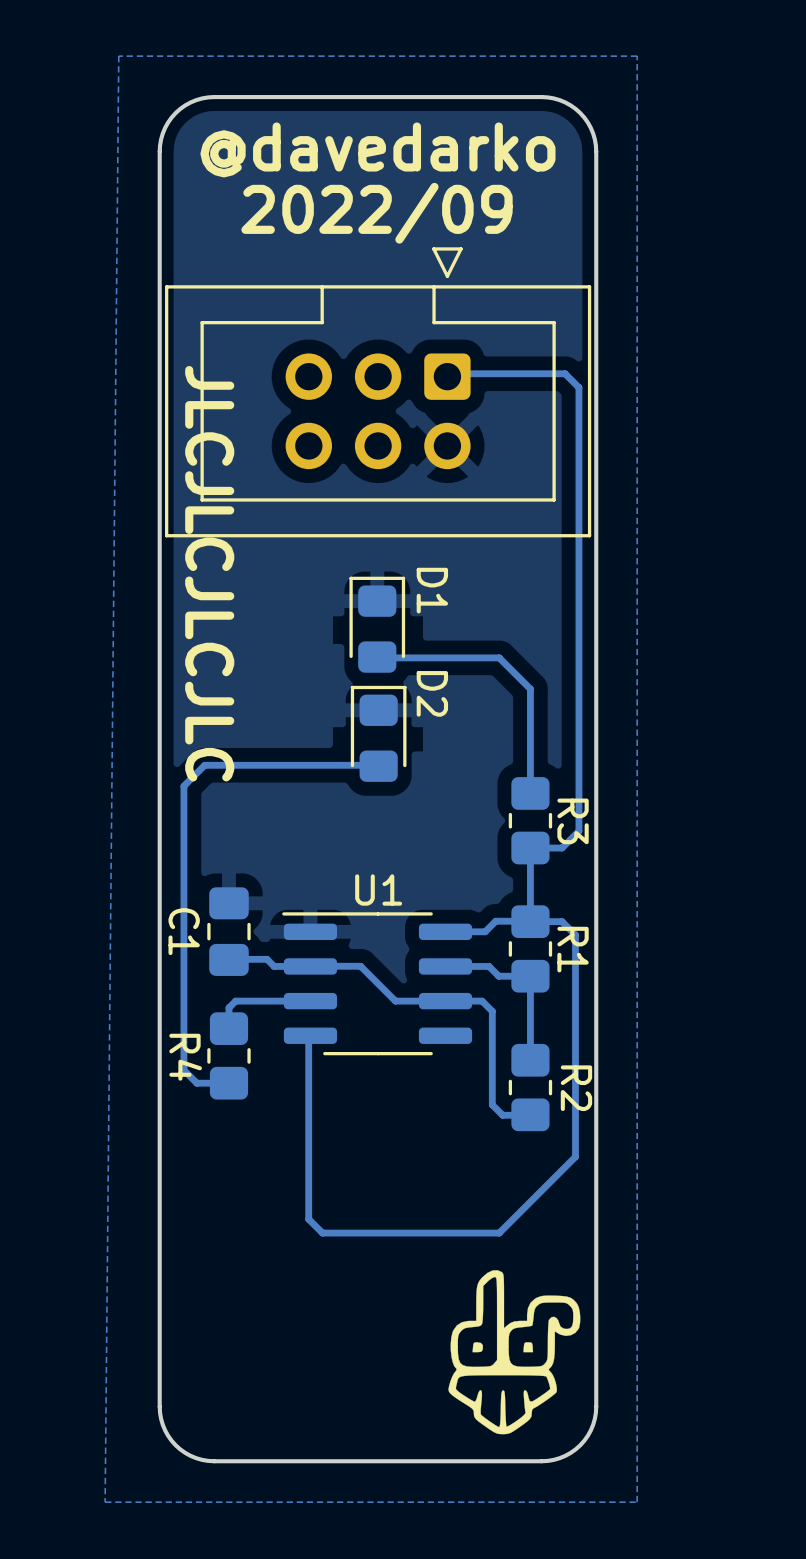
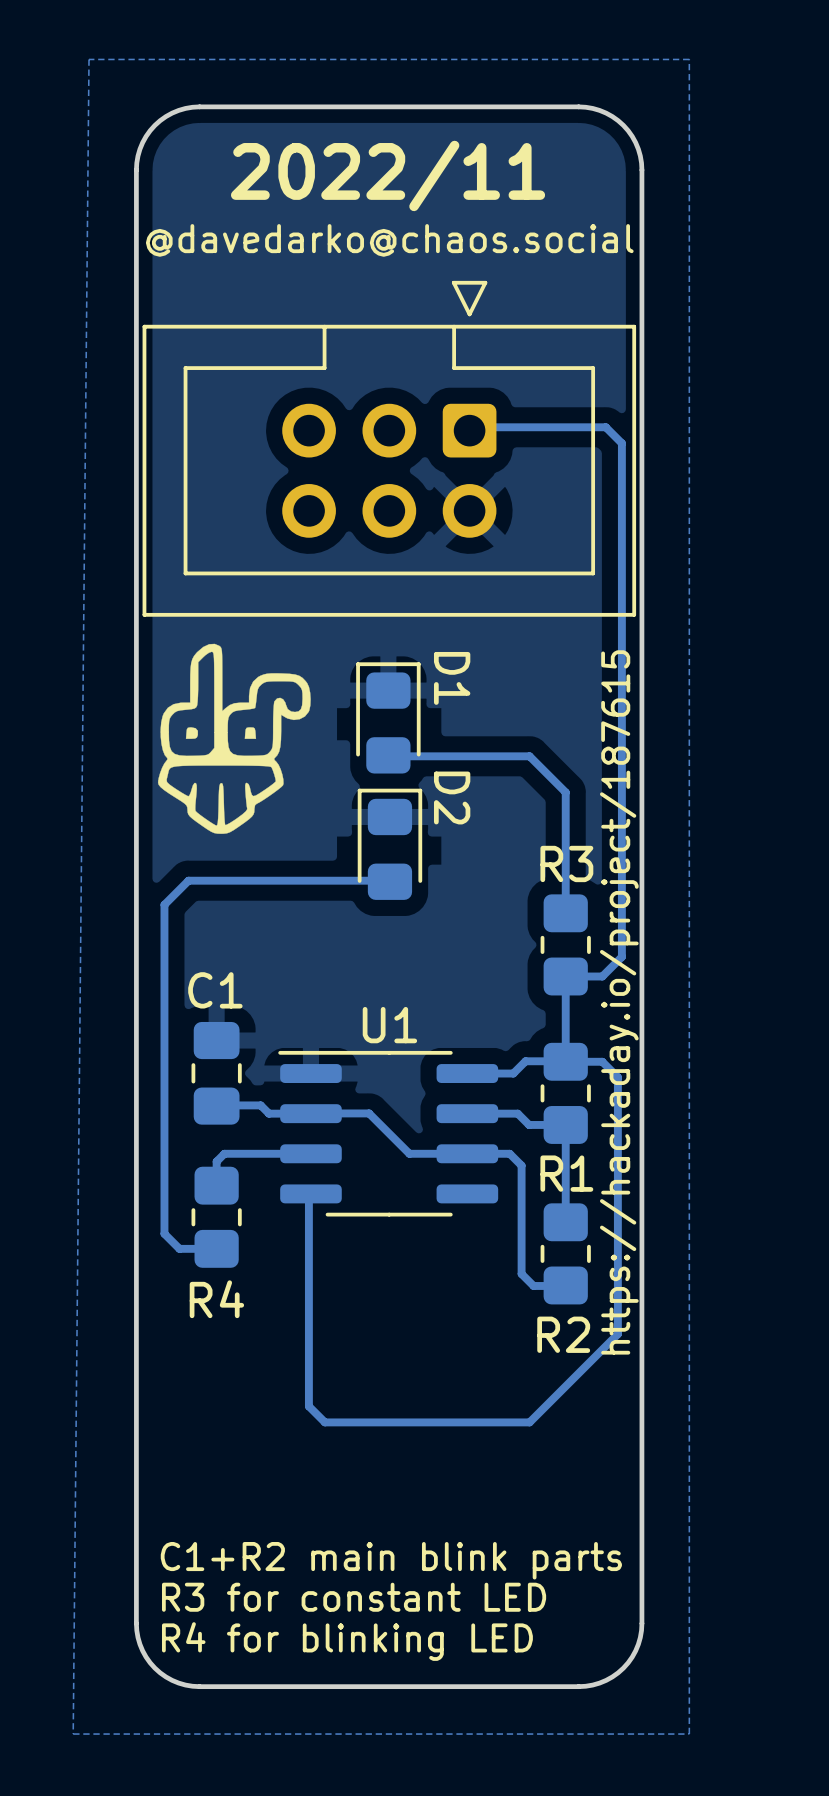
text: @davedarko (377, 149) -> 2022/11 (388, 175)
text: 2022/09 (377, 213) -> @davedarko@chaos.social (389, 240)
drawing: none -> [157, 643, 311, 834]
text: JLCJLCJLCJLC (209, 573) -> none
R3 name rotation: 0° (573, 821) -> 90° counterclockwise (566, 863)
R3 name position: R3 (573, 821) -> R3 (566, 863)
text: none -> https://hackaday.io/project/187615 (619, 1002)
C1 name rotation: 0° (184, 931) -> 90° counterclockwise (215, 990)
C1 name position: C1 (184, 931) -> C1 (215, 990)
R1 name rotation: 0° (573, 949) -> 90° counterclockwise (566, 1173)
R1 name position: R1 (573, 949) -> R1 (566, 1173)
R4 name rotation: 0° (185, 1057) -> 90° counterclockwise (216, 1299)
R4 name position: R4 (185, 1057) -> R4 (216, 1299)
R2 name rotation: 0° (576, 1088) -> 90° counterclockwise (563, 1334)
R2 name position: R2 (576, 1088) -> R2 (563, 1334)
drawing: [448, 1270, 581, 1435] -> none
text: none -> C1+R2 main blink parts (391, 1560)
text: none -> R3 for constant LED (354, 1597)
text: none -> R4 for blinking LED (347, 1641)

